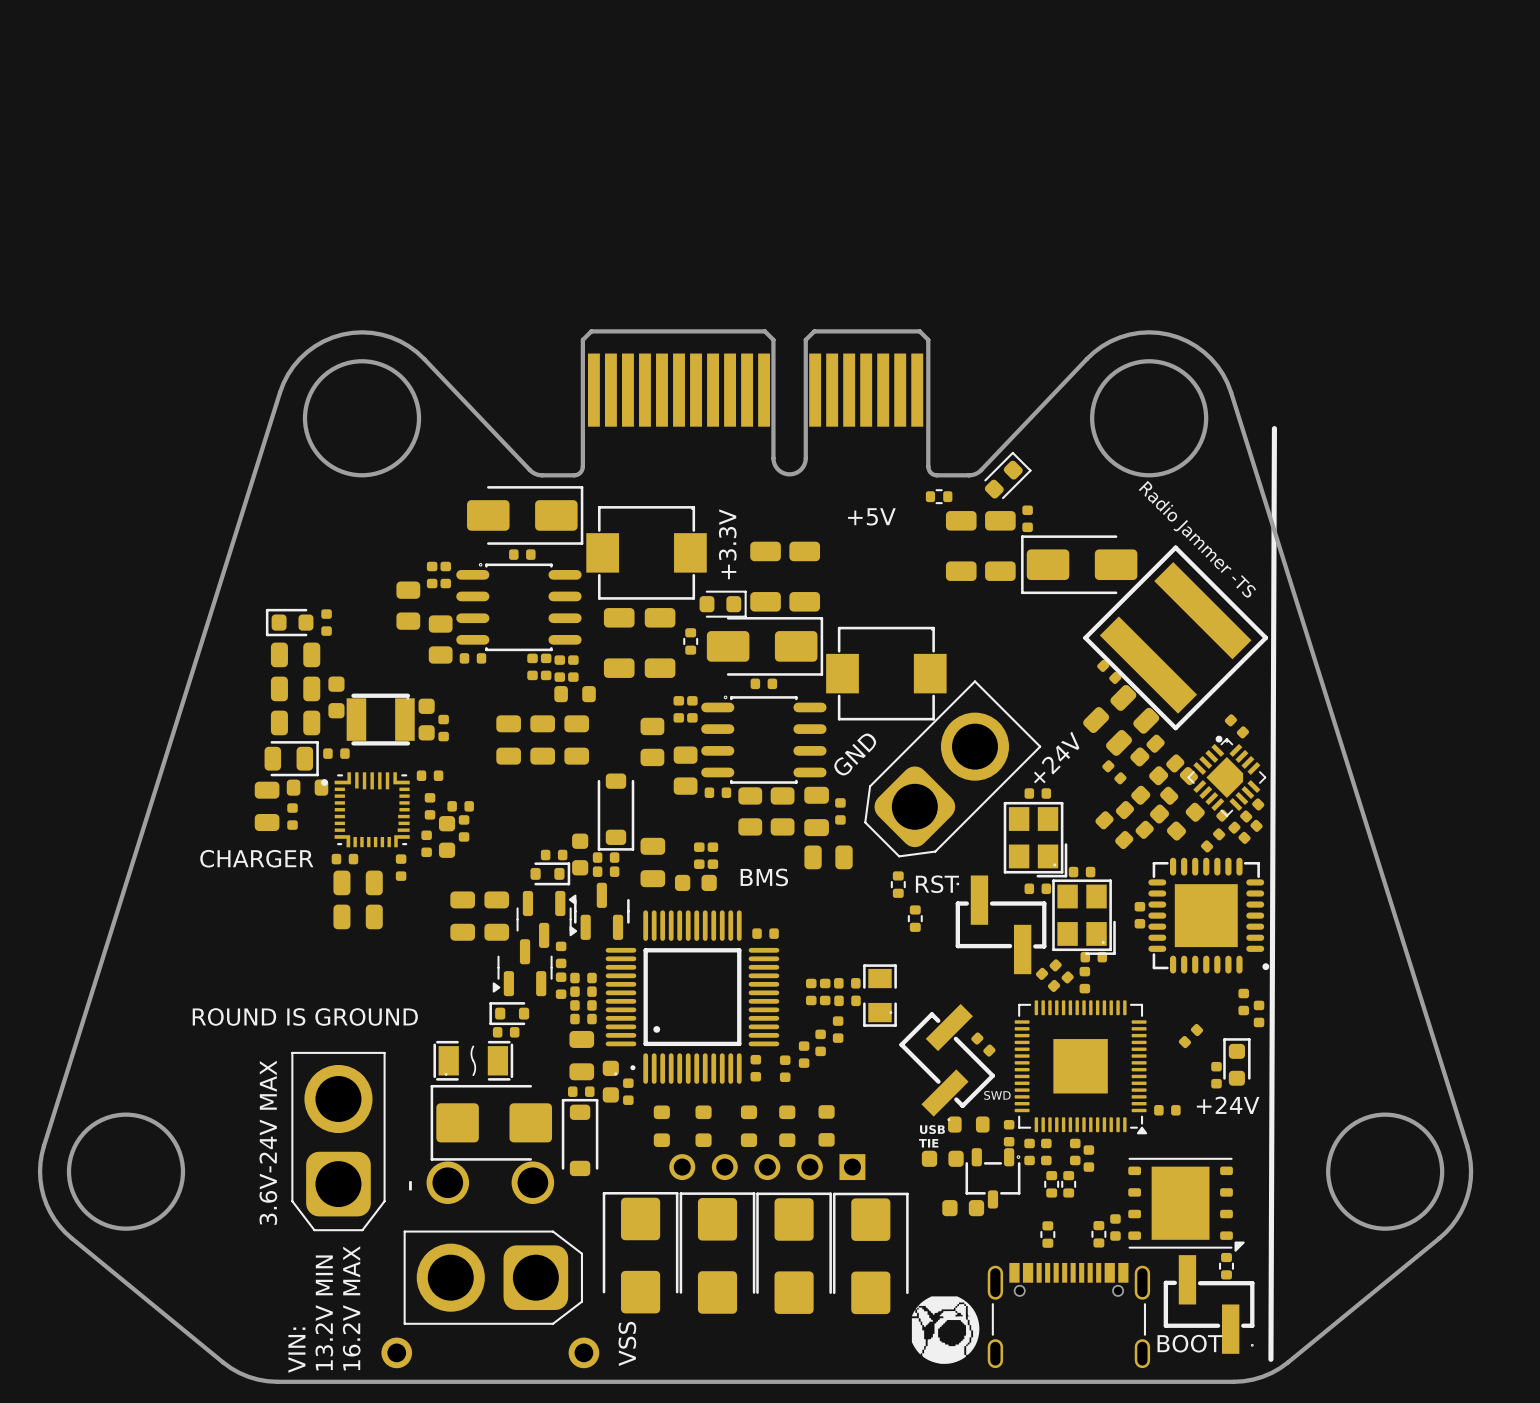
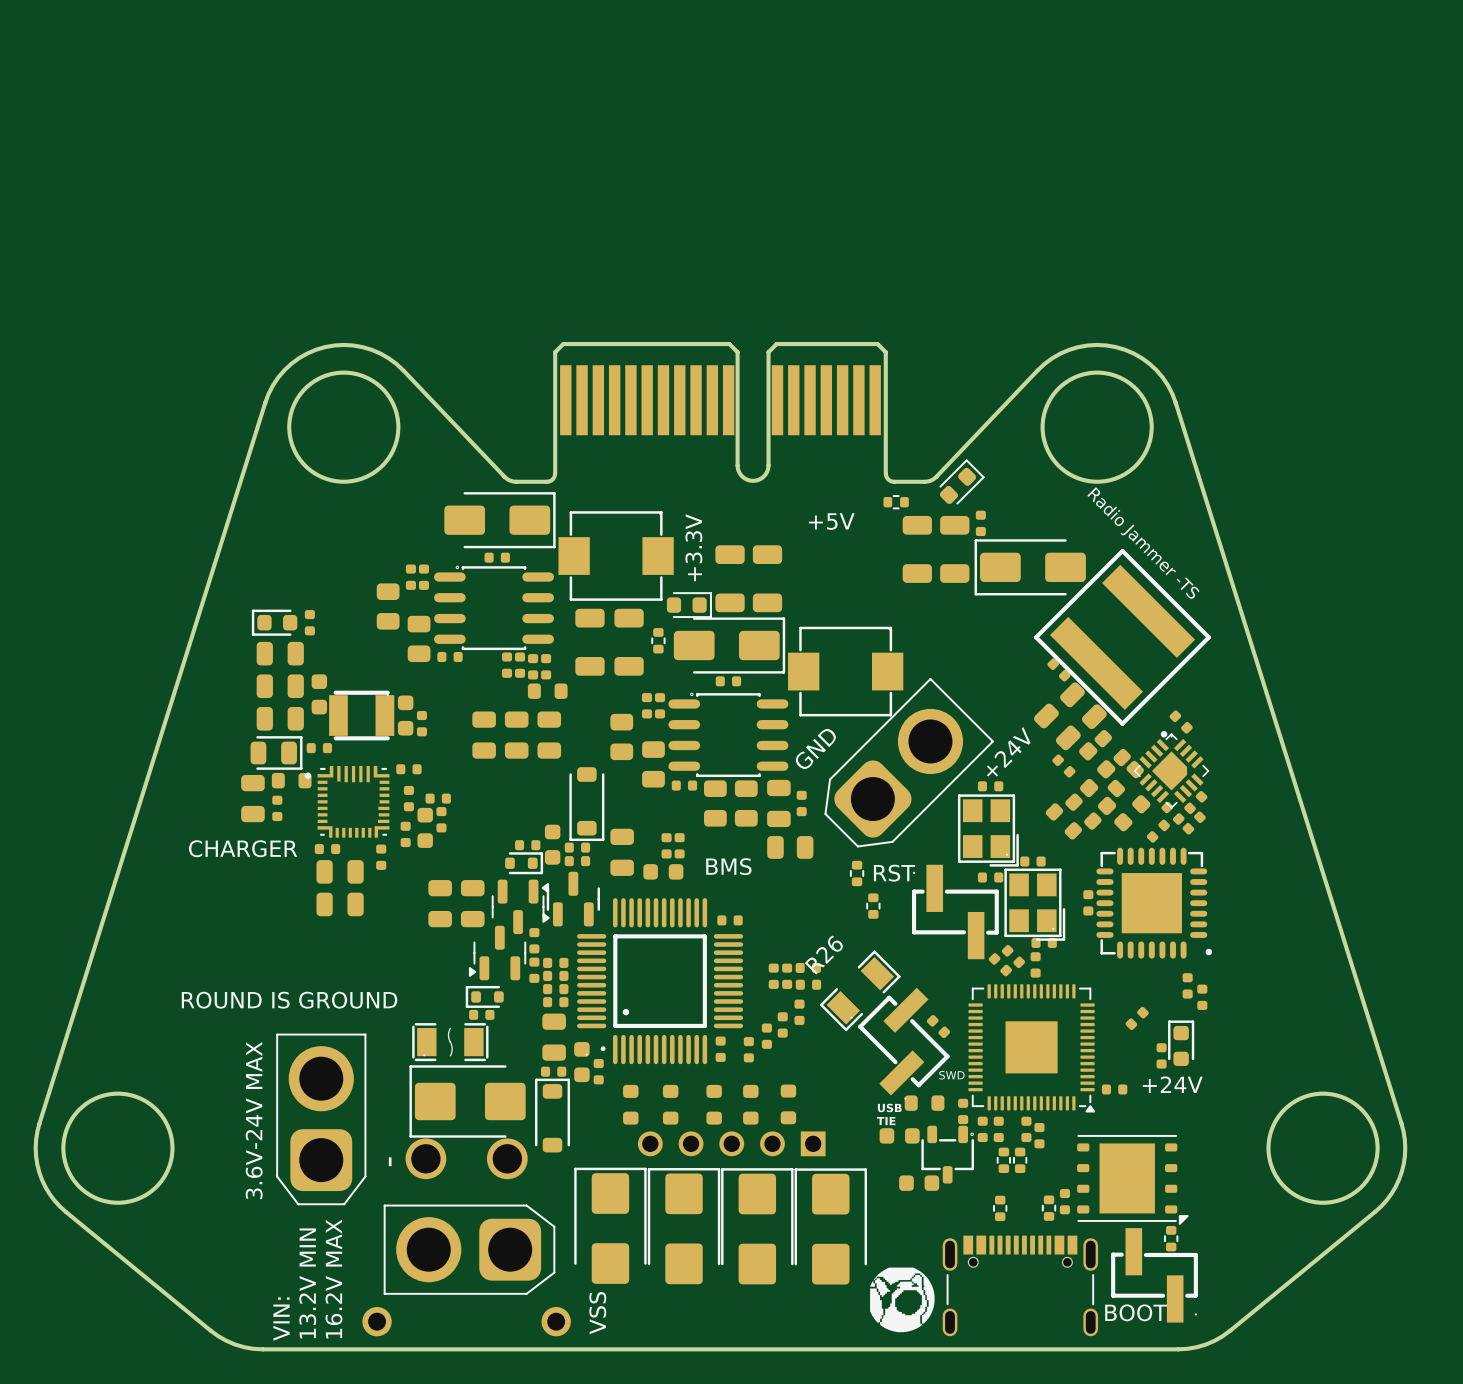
line: (1274, 428) (1270, 1359) -> none
part: (880, 995) -> none
R26: none -> (860, 990)

